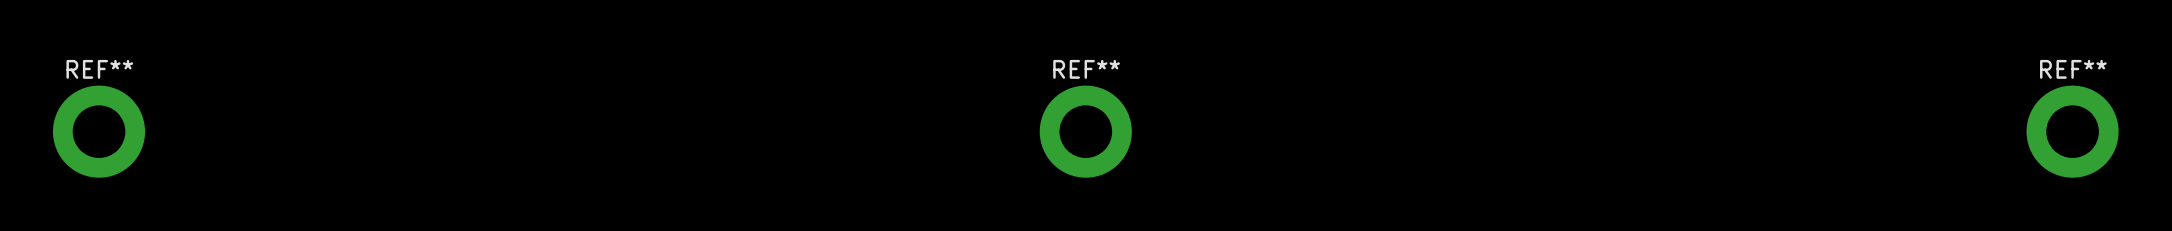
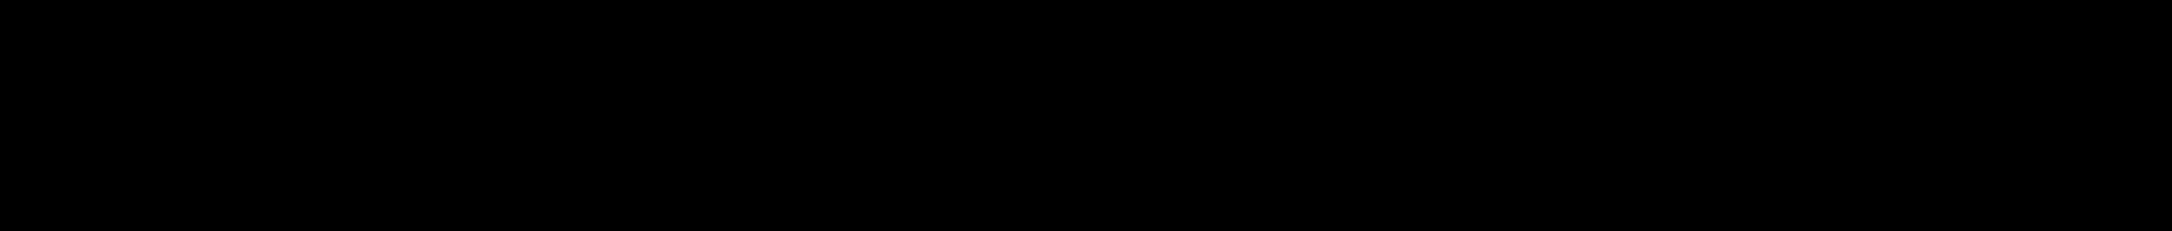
REF**: (99, 131) -> none
REF**: (1085, 131) -> none
REF**: (2072, 131) -> none

